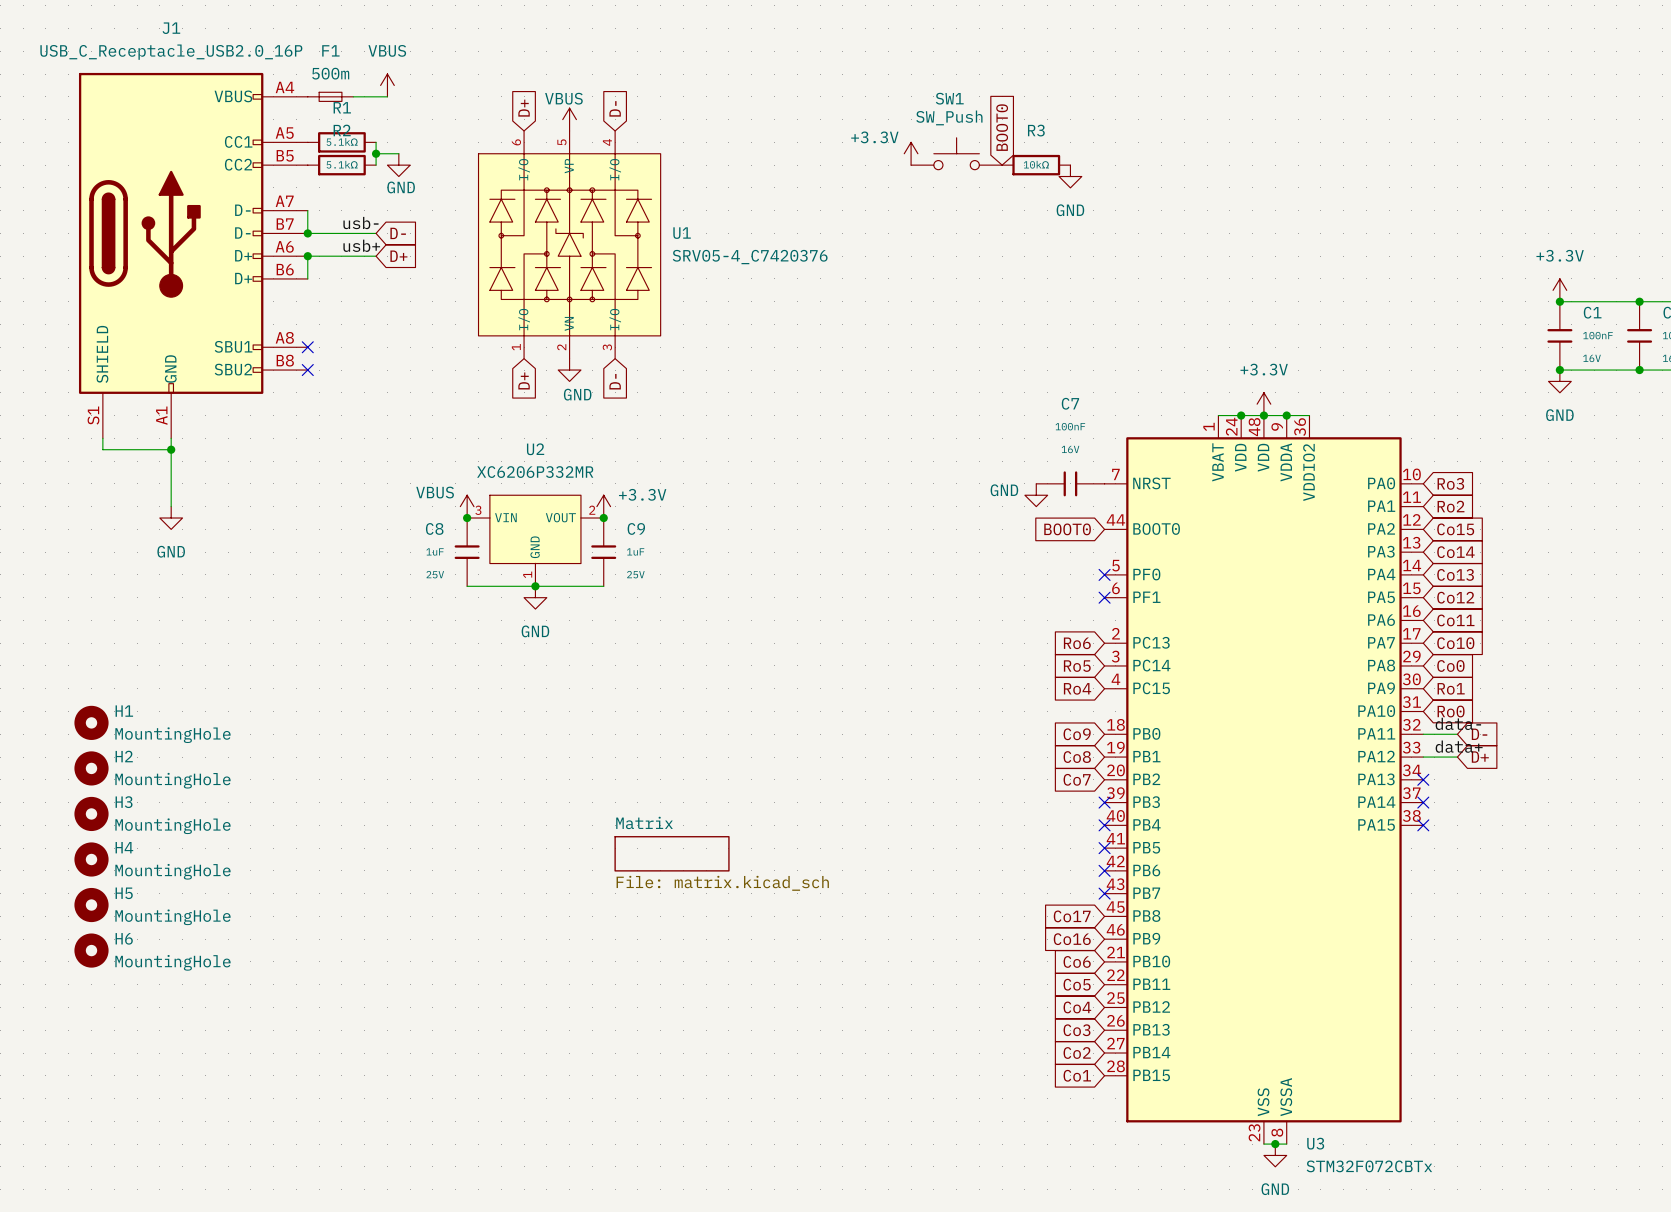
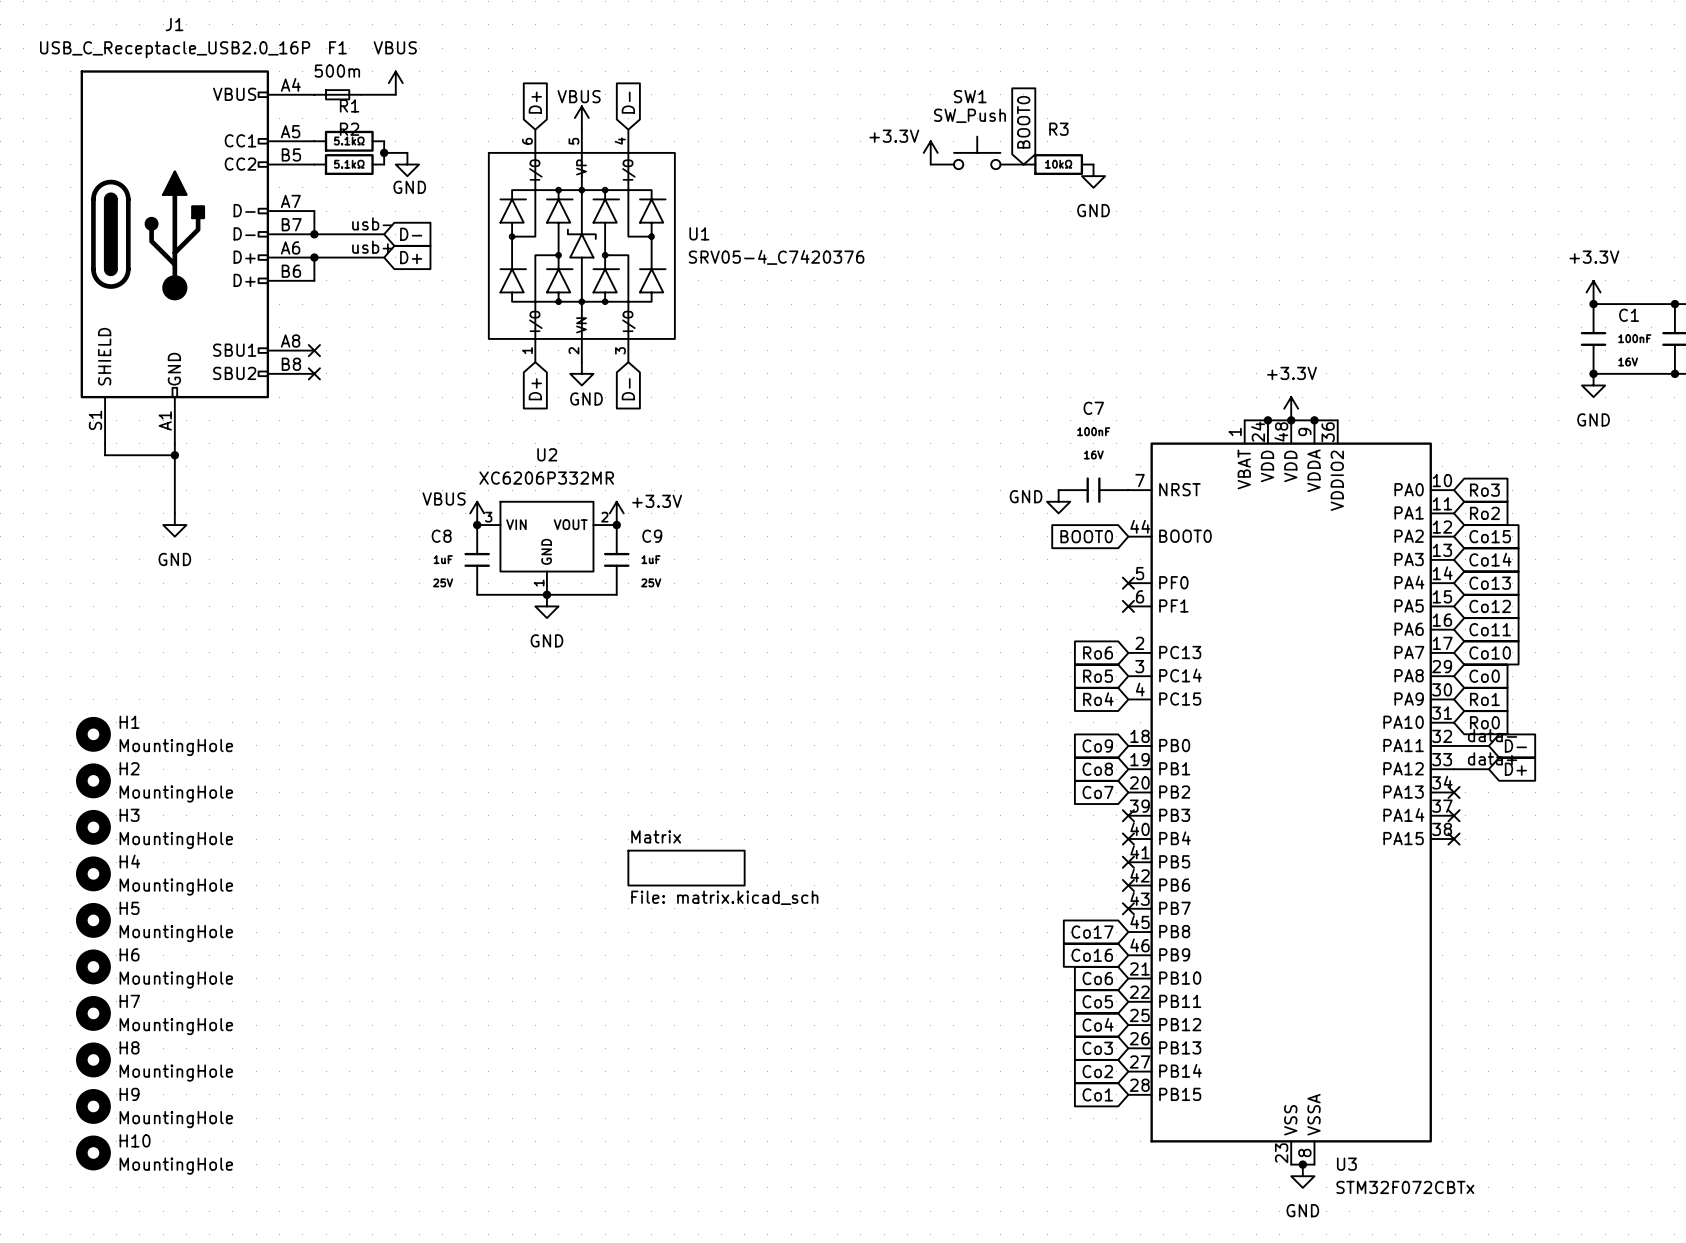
H7: none -> MountingHole (93, 1013)
H8: none -> MountingHole (93, 1059)
H9: none -> MountingHole (93, 1106)
H10: none -> MountingHole (93, 1152)

